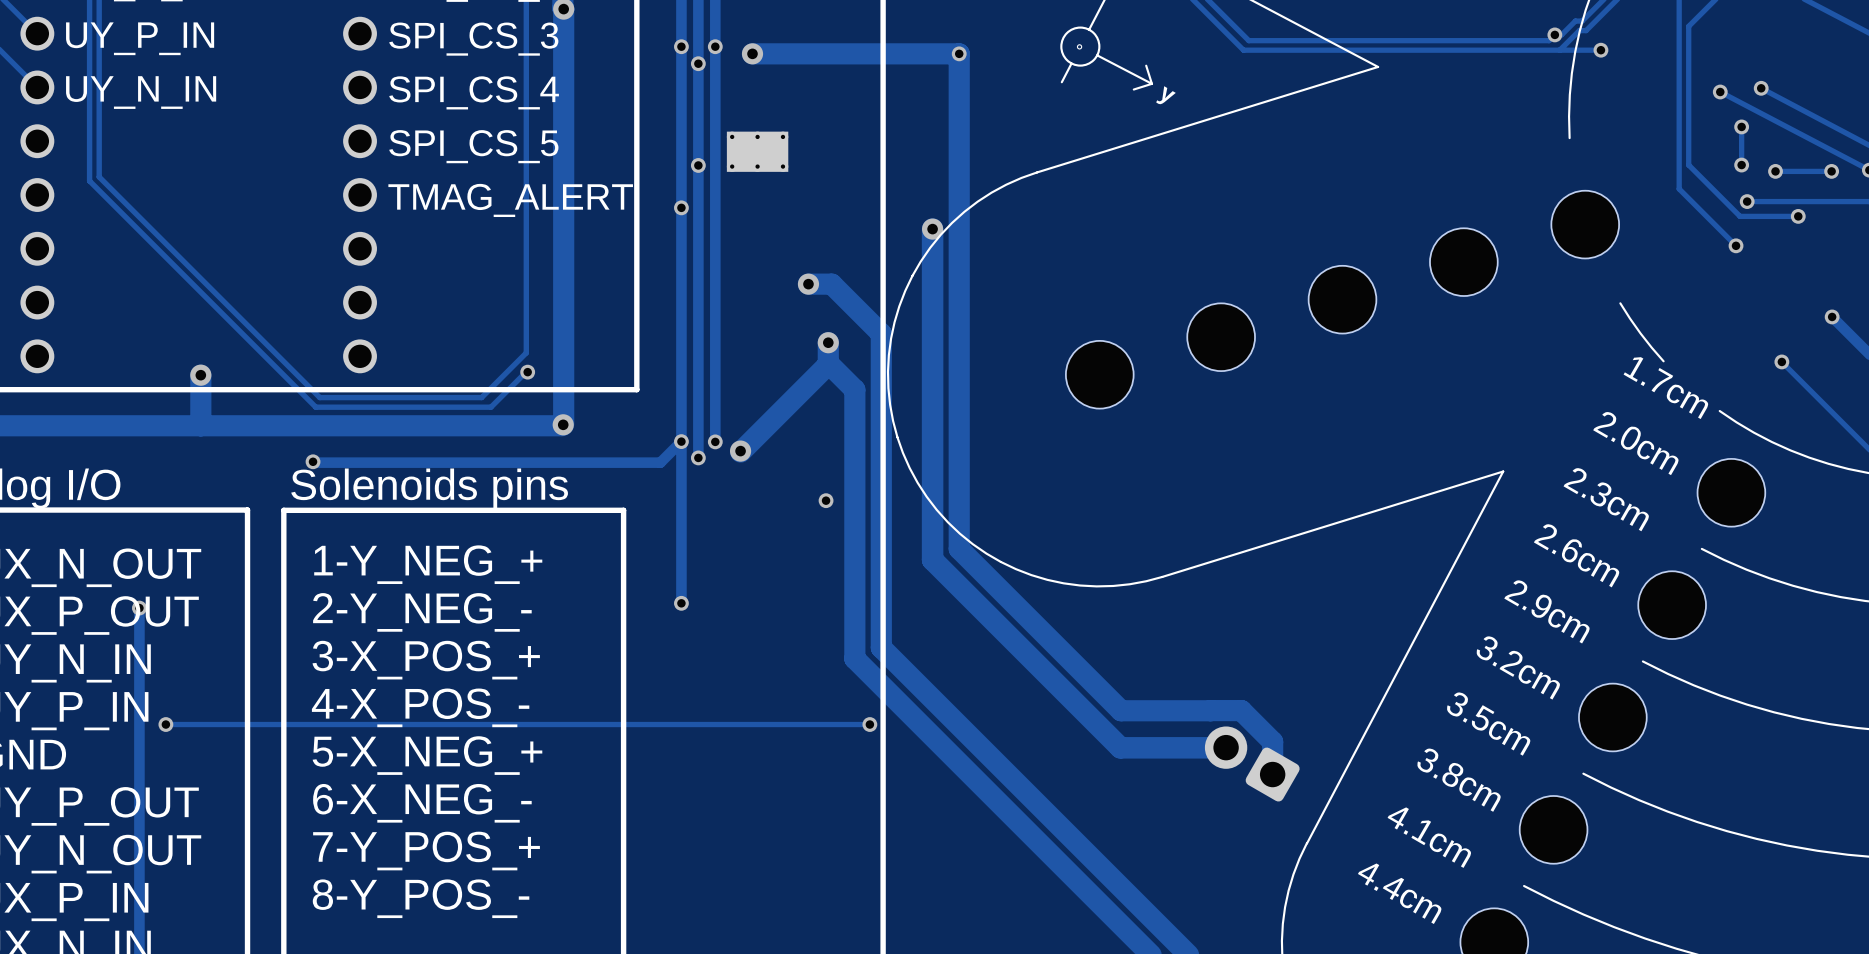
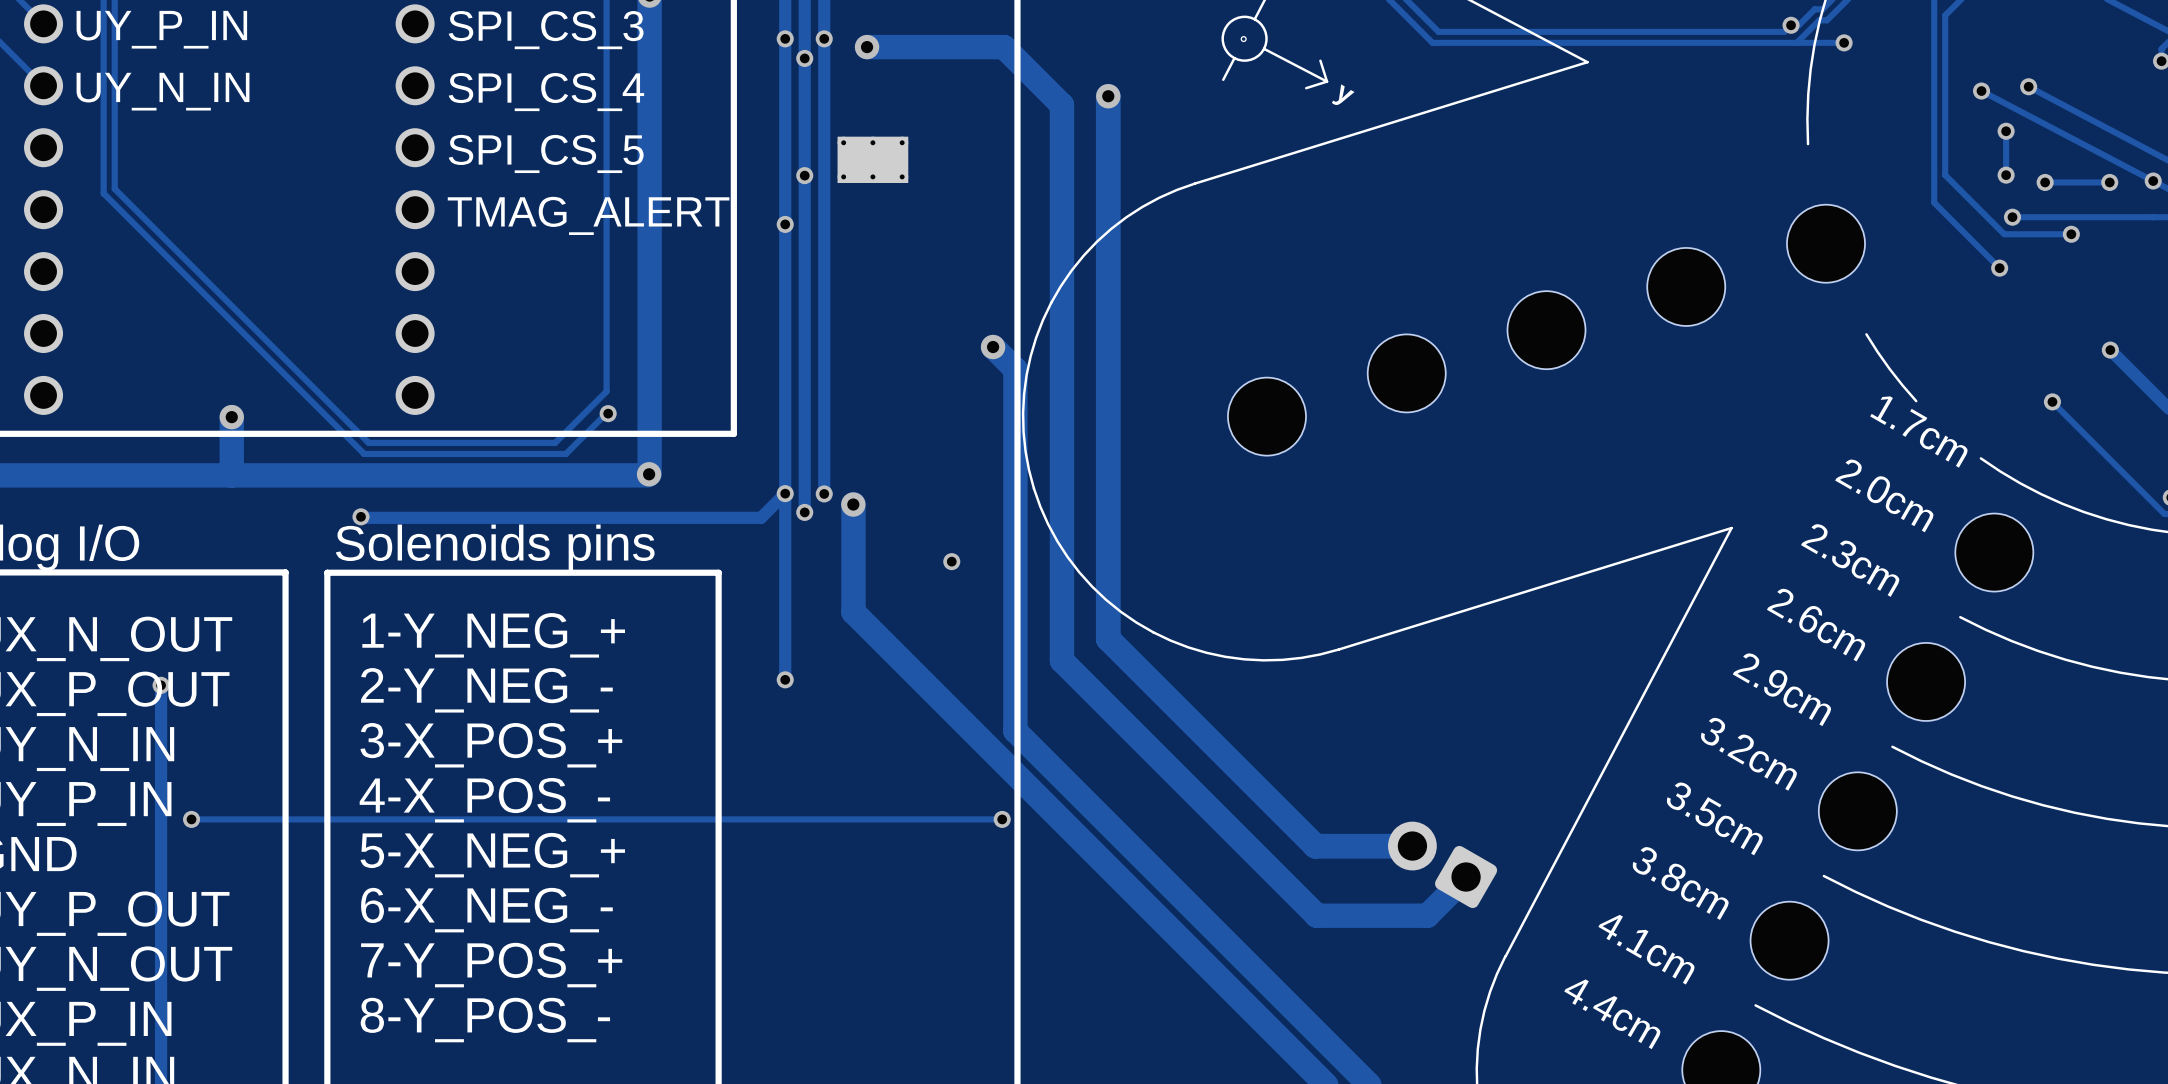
track: (871, 53) (959, 53) (959, 548) (1121, 710) (1210, 710) -> (1004, 47) (1061, 105) (1061, 660) (1316, 915) (1427, 915) (1466, 877)
via: (959, 53) -> none
via: none -> (1108, 96)
track: (932, 229) (932, 559) (1120, 747) (1141, 747) -> (1108, 96) (1108, 639) (1315, 846)
via: (932, 229) -> none
track: (808, 284) (831, 284) (861, 314) -> none
via: (808, 284) -> none
via: none -> (993, 347)
track: (828, 342) (828, 364) (740, 452) -> none
via: (828, 342) -> none
track: (828, 363) (854, 389) (854, 658) -> (853, 504) (853, 612) (984, 743)
track: (1210, 710) (1241, 710) (1272, 741) (1272, 774) -> none

